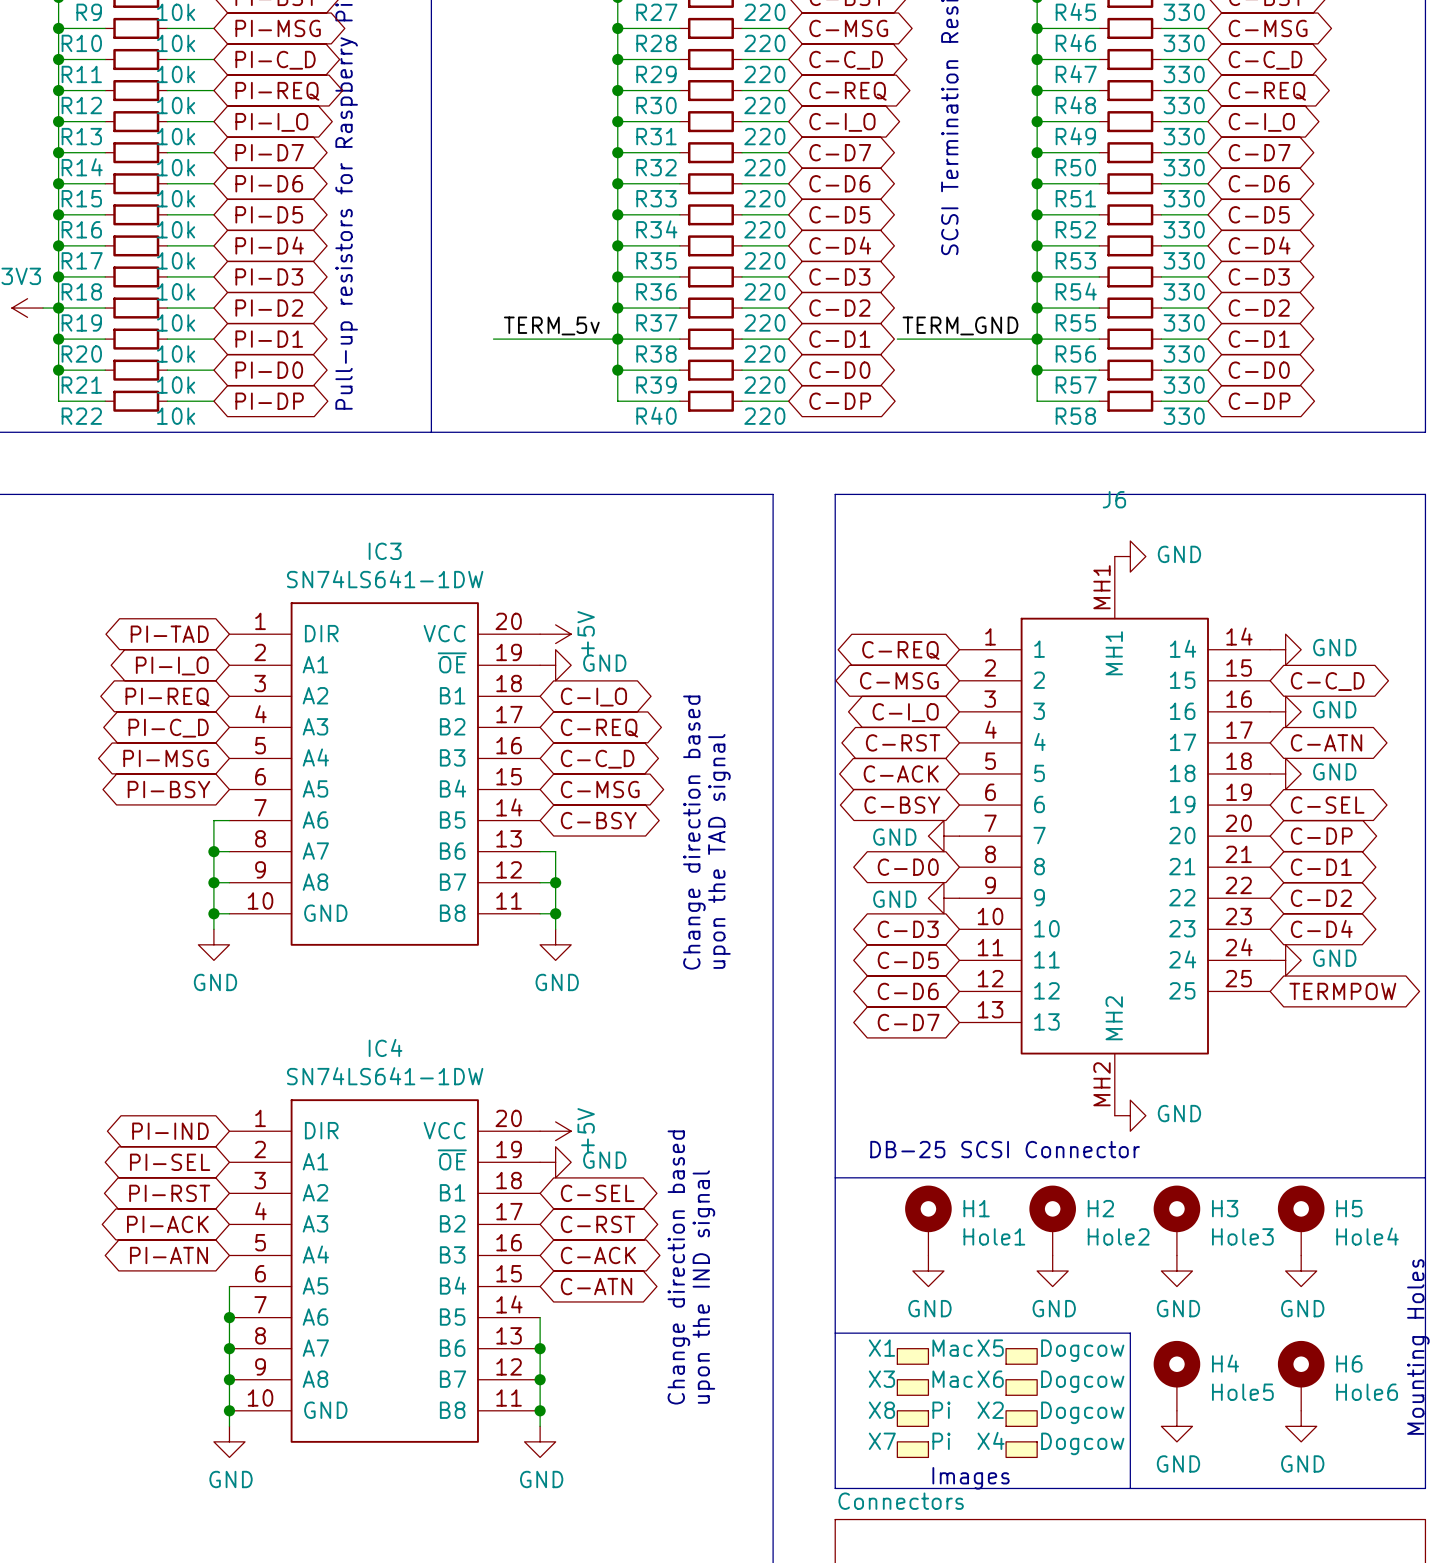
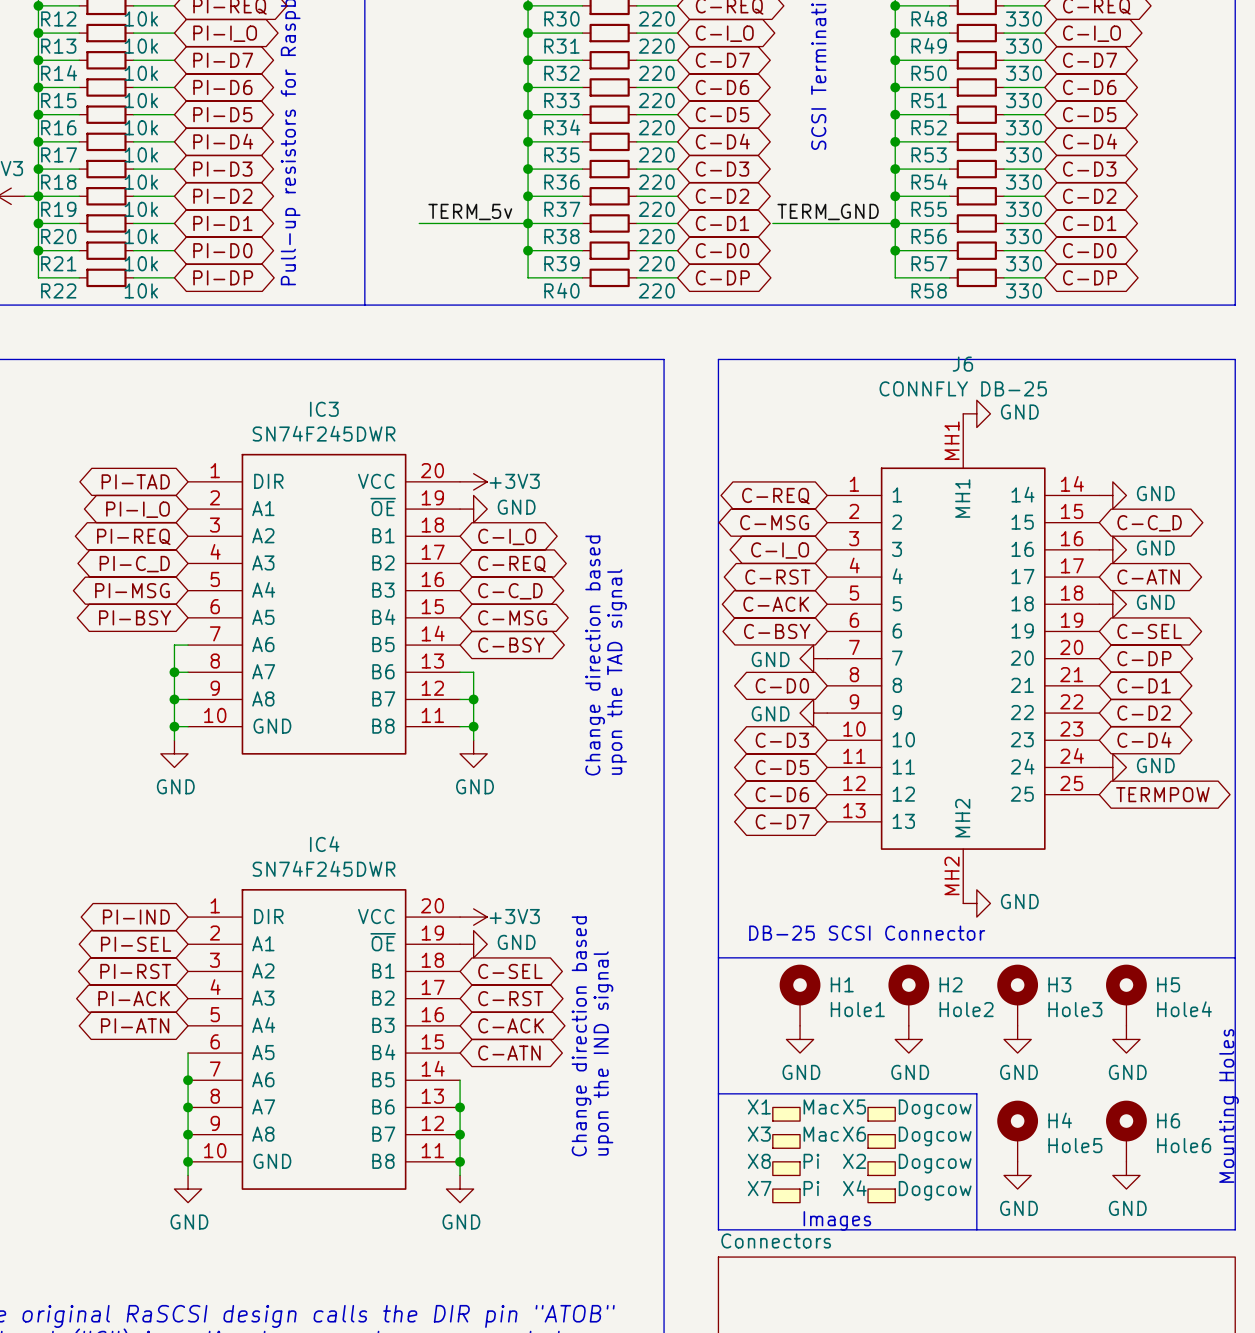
J6 value: none -> CONNFLY DB-25 (963, 388)
IC3 value: SN74LS641-1DW (385, 579) -> SN74F245DWR (324, 433)
power symbol: +5V (555, 634) -> +3V3 (473, 481)
IC4 value: SN74LS641-1DW (385, 1076) -> SN74F245DWR (324, 868)
power symbol: +5V (555, 1131) -> +3V3 (473, 917)

